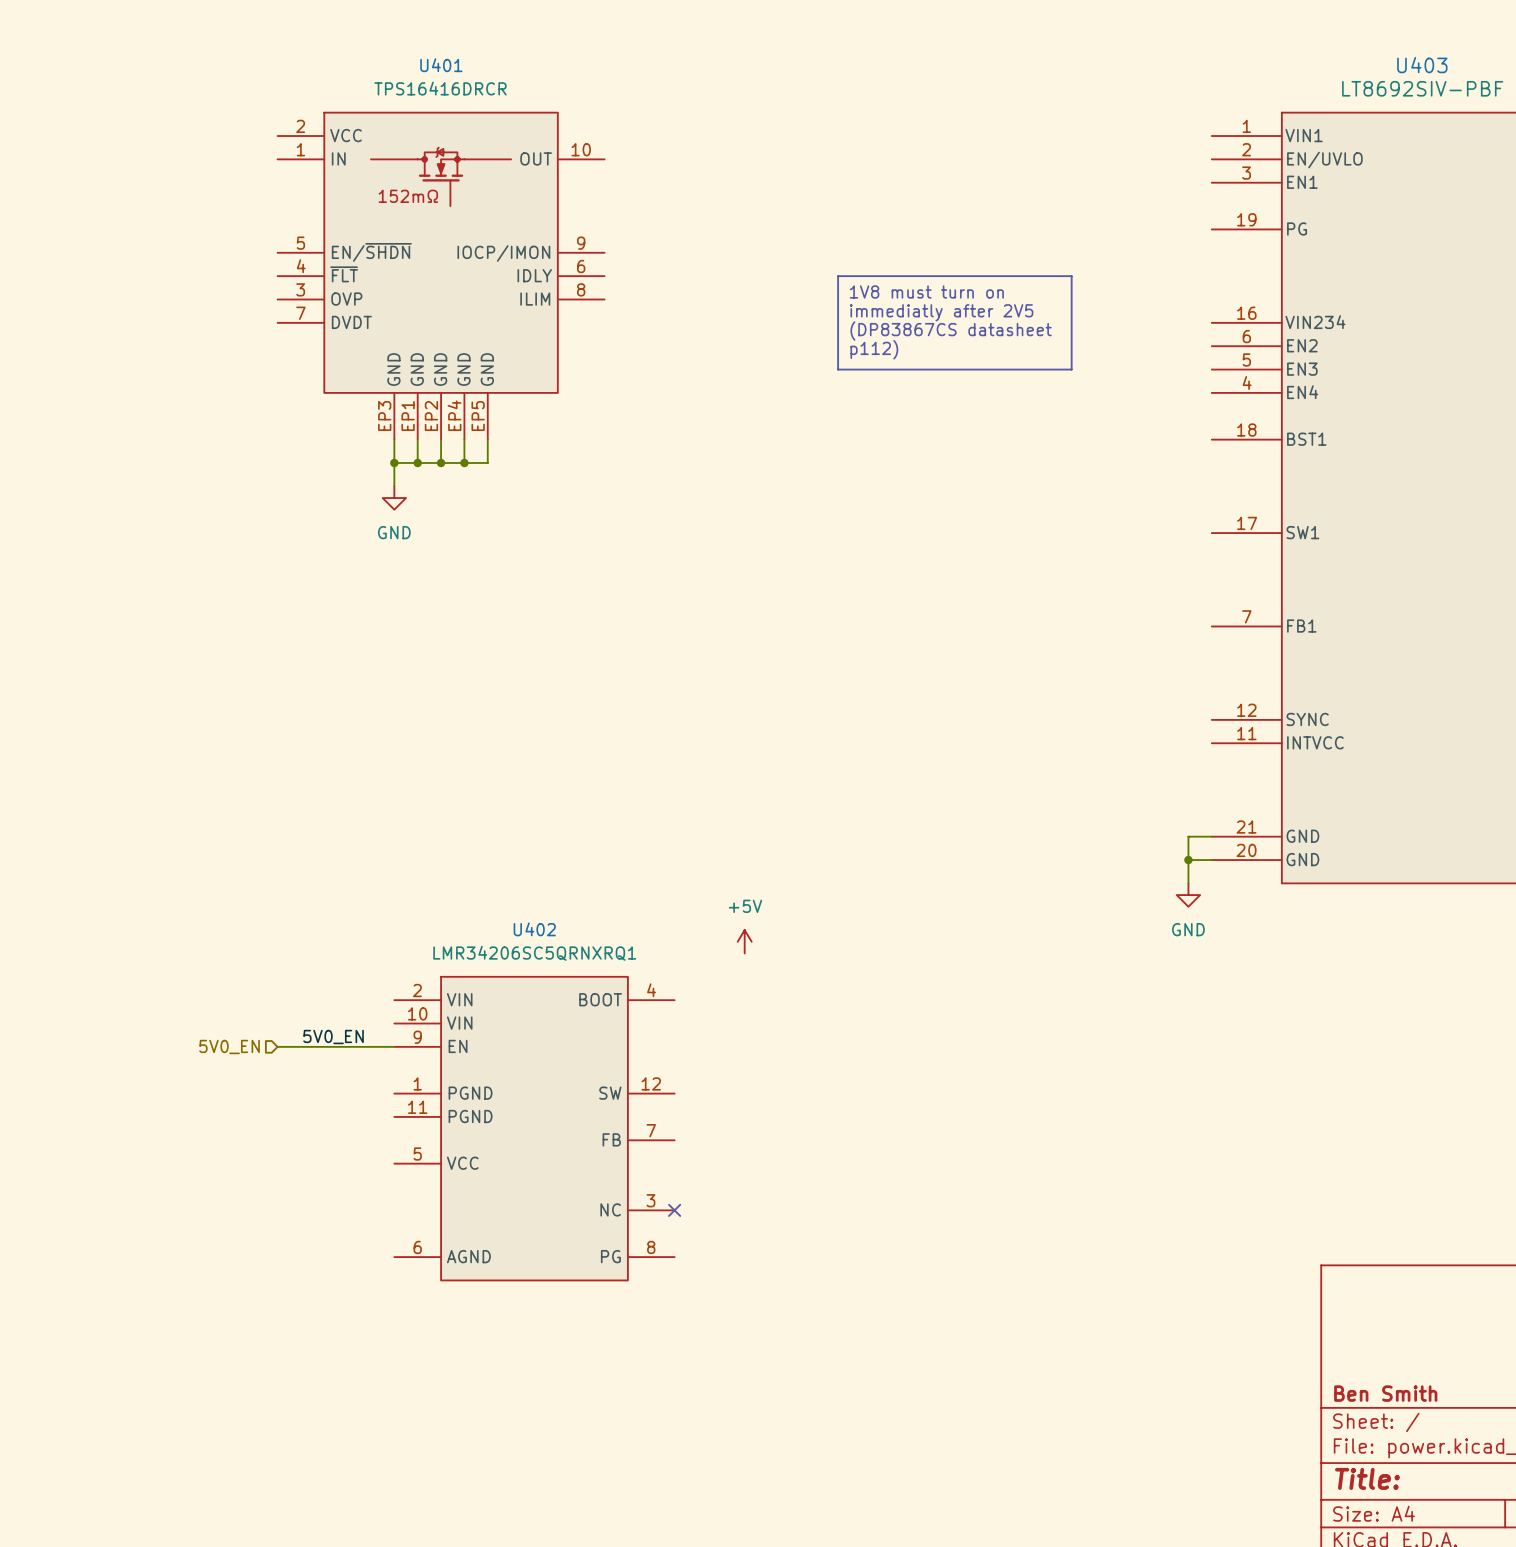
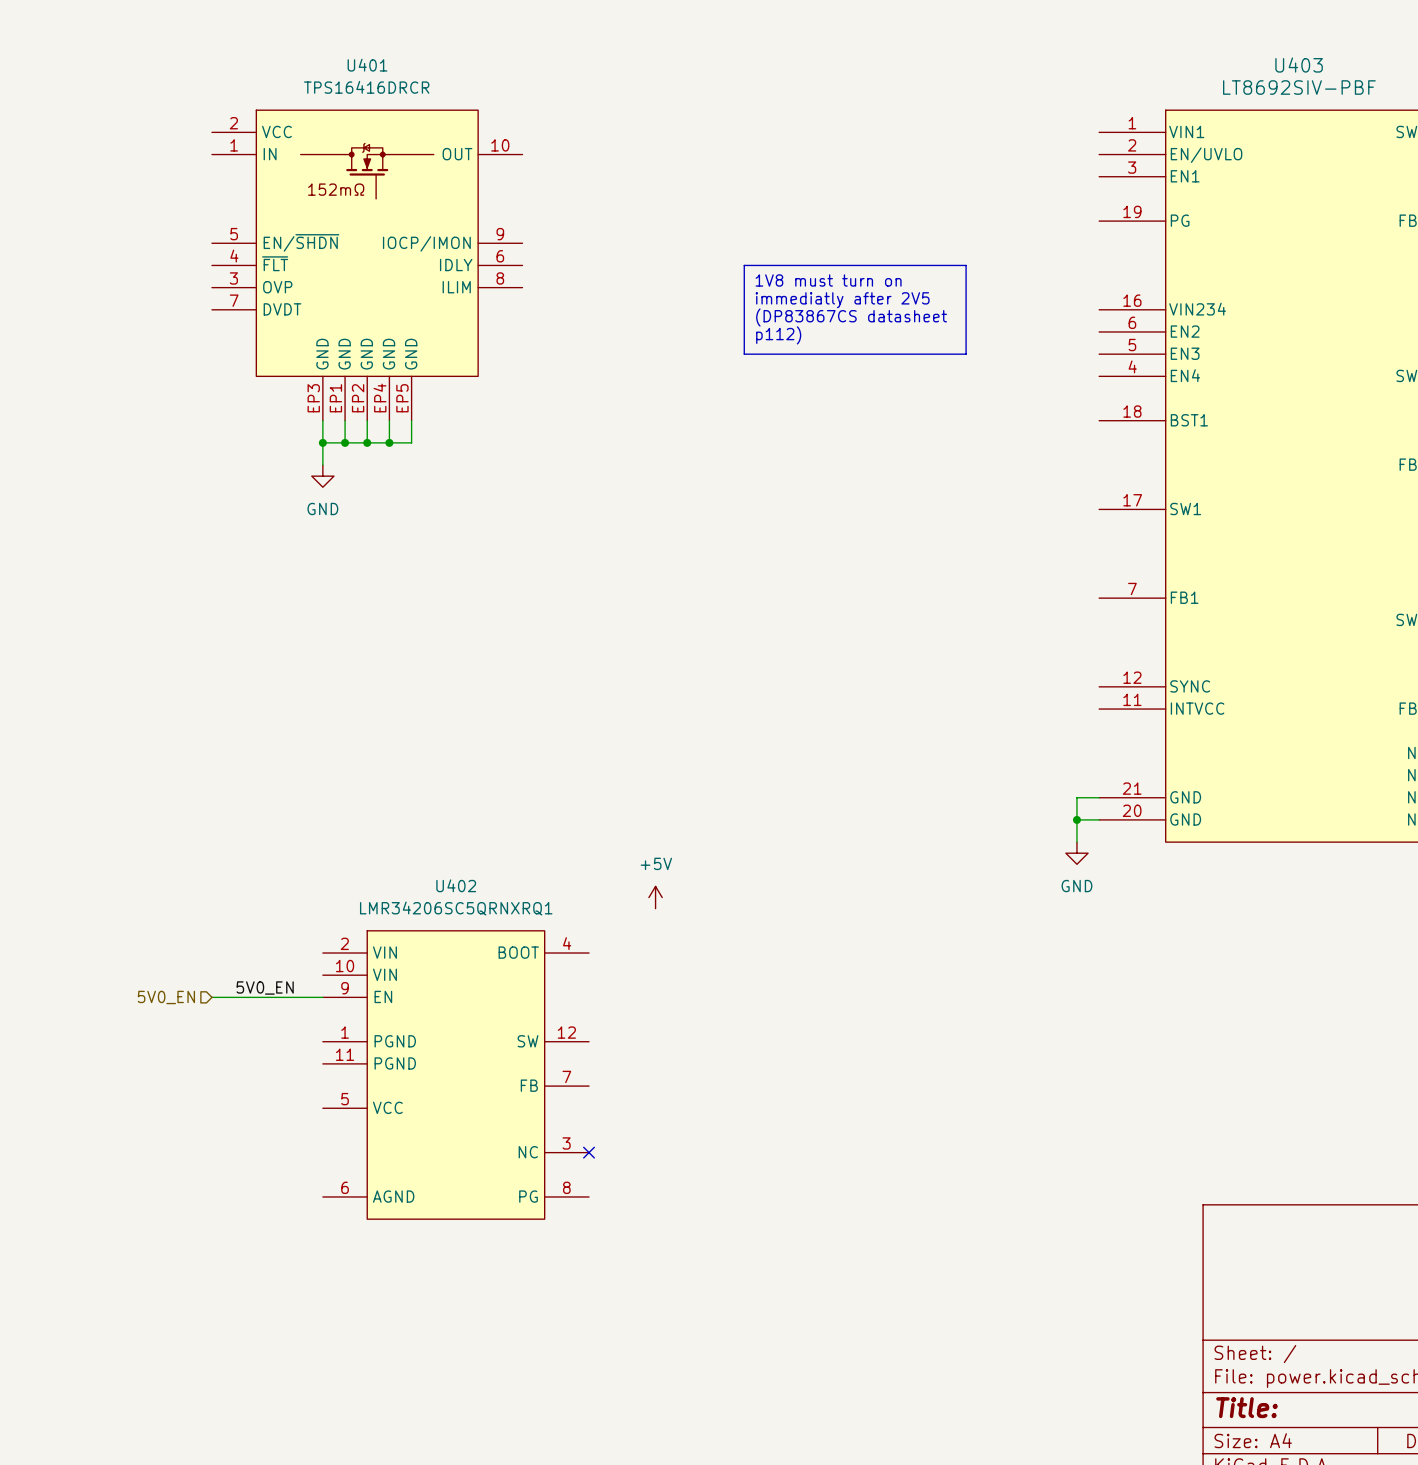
title block: Ben Smith (1385, 1393) -> none

